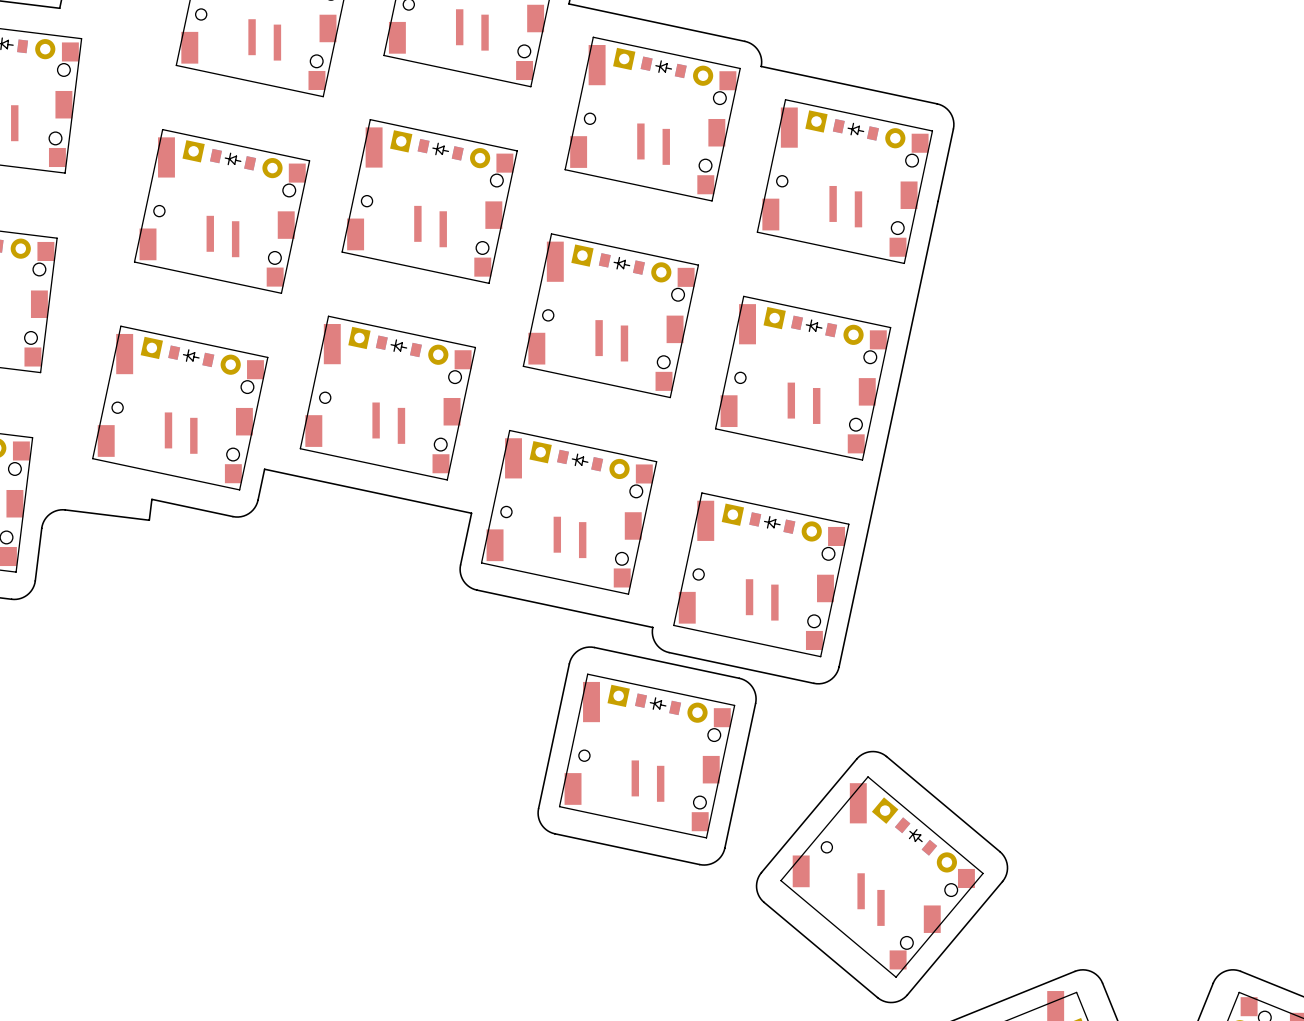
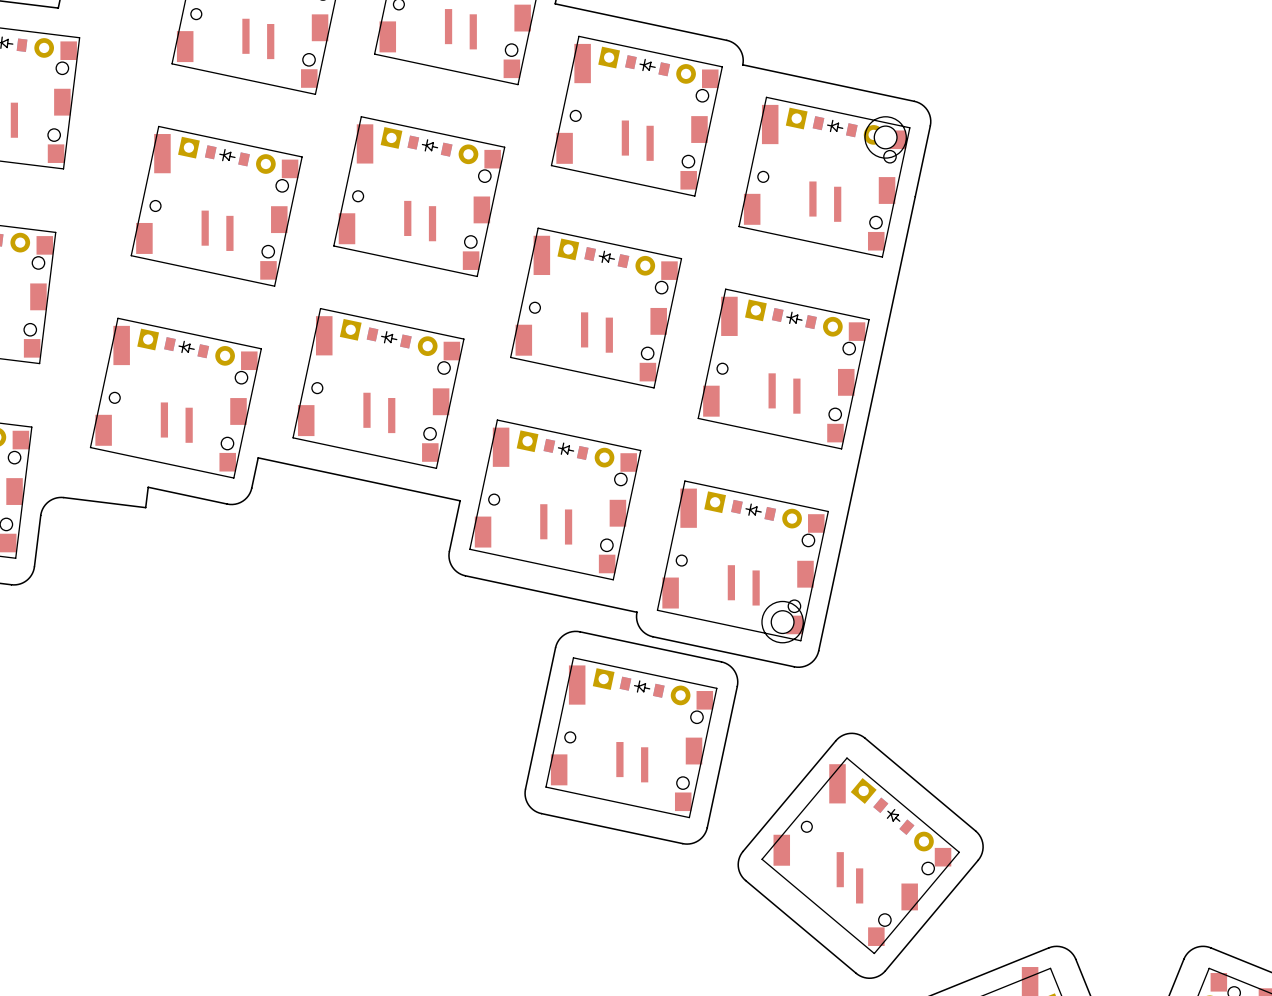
part: none -> (885, 137)
part: none -> (782, 622)

